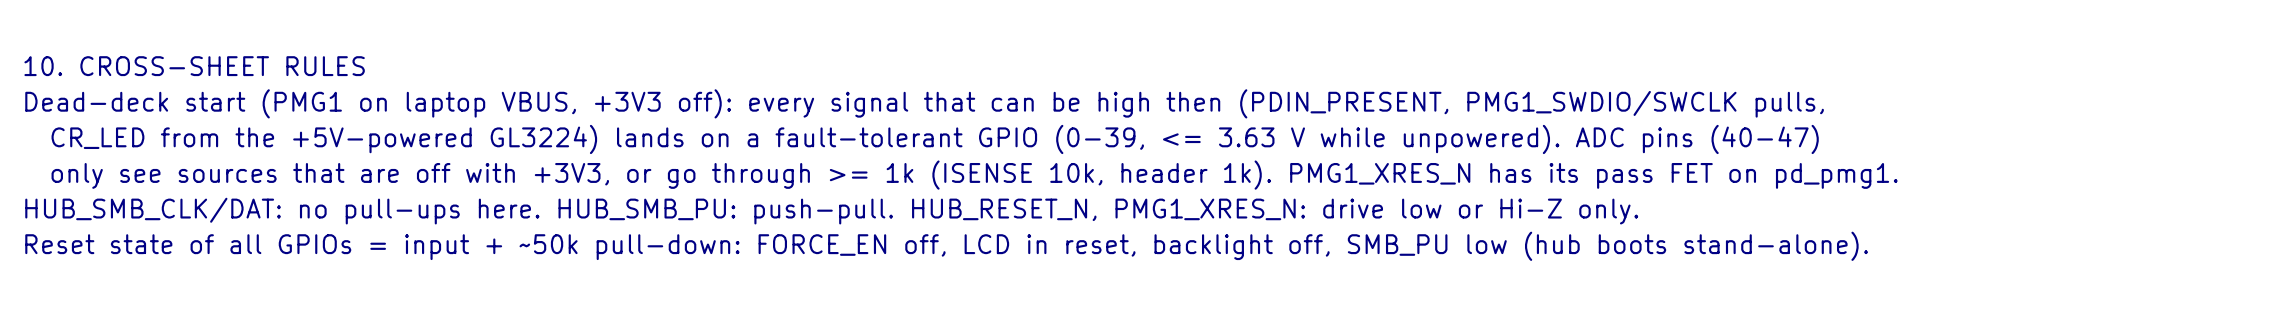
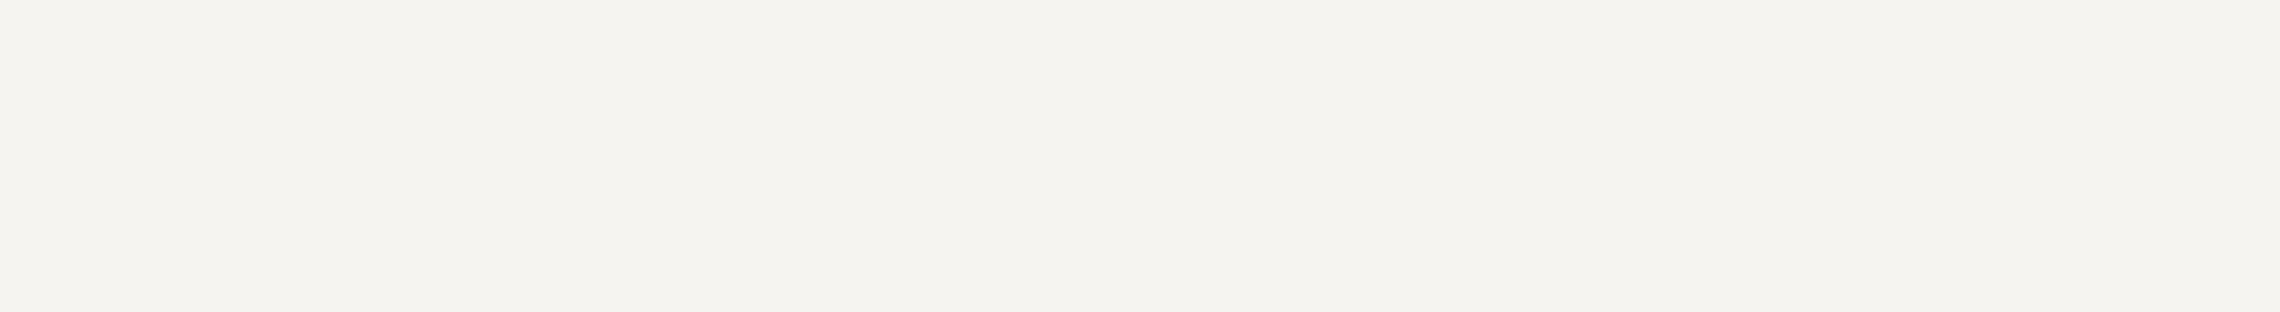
text: 10. CROSS-SHEET RULES (194, 66) -> none
text: Dead-deck start (PMG1 on laptop VBUS, +3V3 off): every signal that can be high then (PDIN_PRESENT, PMG1_SWDIO/SWCLK pulls, (924, 103) -> none
text: CR_LED from the +5V-powered GL3224) lands on a fault-tolerant GPIO (0-39, <= 3.63 V while unpowered). ADC pins (40-47) (935, 139) -> none
text: only see sources that are off with +3V3, or go through >= 1k (ISENSE 10k, header 1k). PMG1_XRES_N has its pass FET on pd_pmg1. (974, 175) -> none
text: HUB_SMB_CLK/DAT: no pull-ups here. HUB_SMB_PU: push-pull. HUB_RESET_N, PMG1_XRES_N: drive low or Hi-Z only. (831, 211) -> none
text: Reset state of all GPIOs = input + ~50k pull-down: FORCE_EN off, LCD in reset, backlight off, SMB_PU low (hub boots stand-alone). (946, 246) -> none

